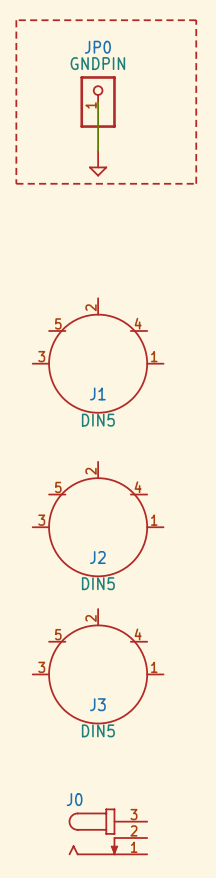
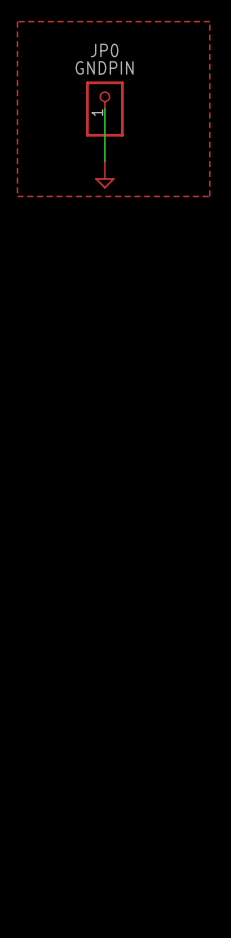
J1: DIN5 (98, 355) -> none
J2: DIN5 (98, 519) -> none
J3: DIN5 (98, 666) -> none
J0: (108, 831) -> none

